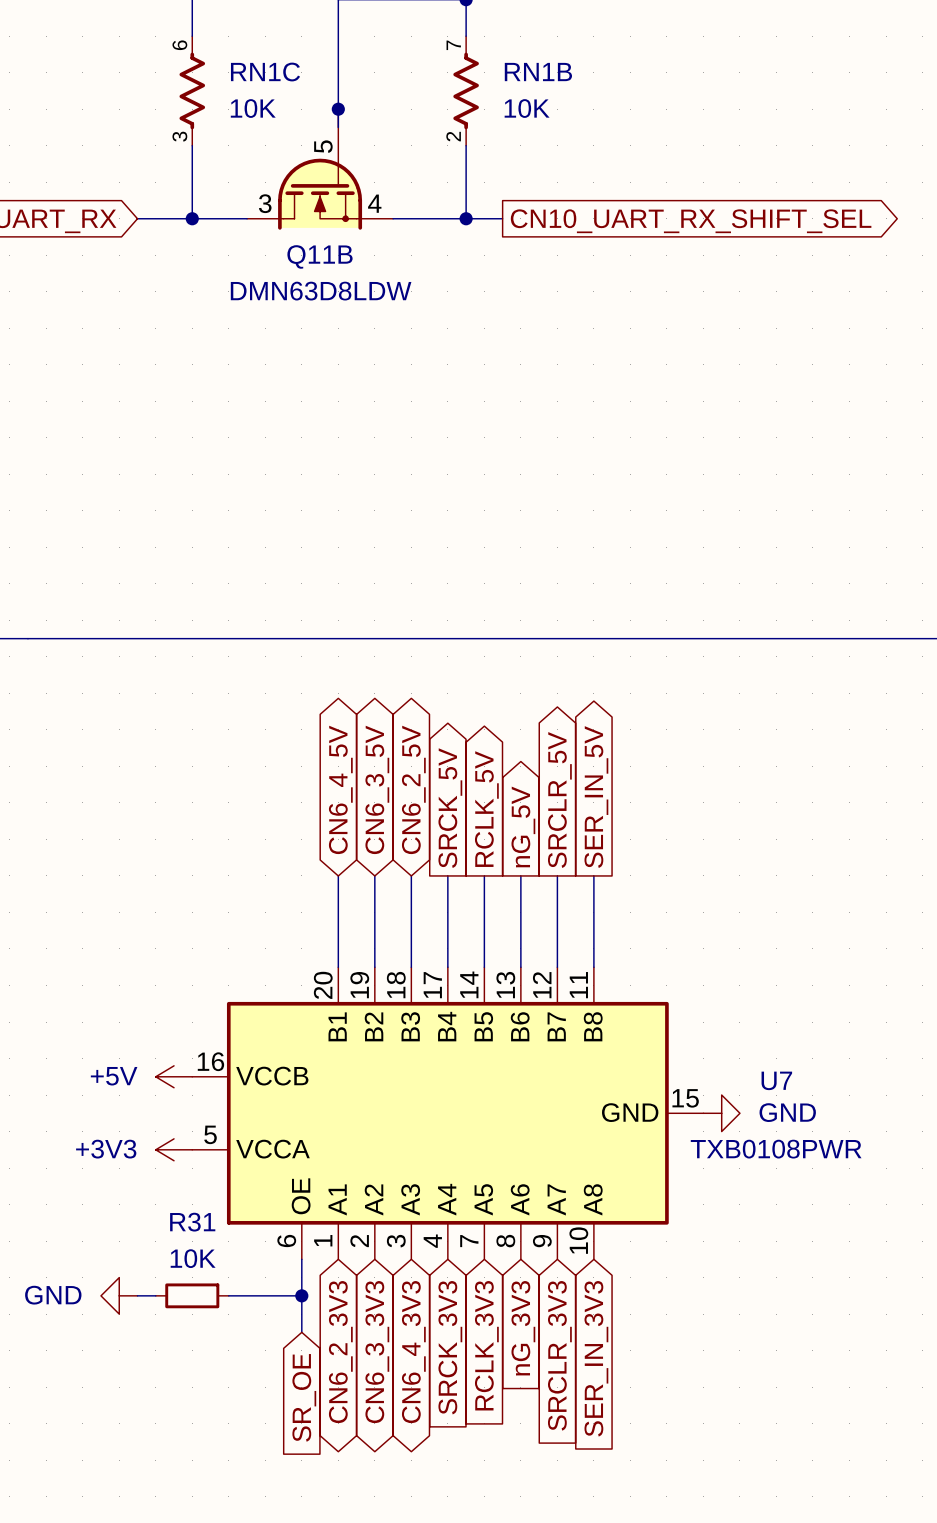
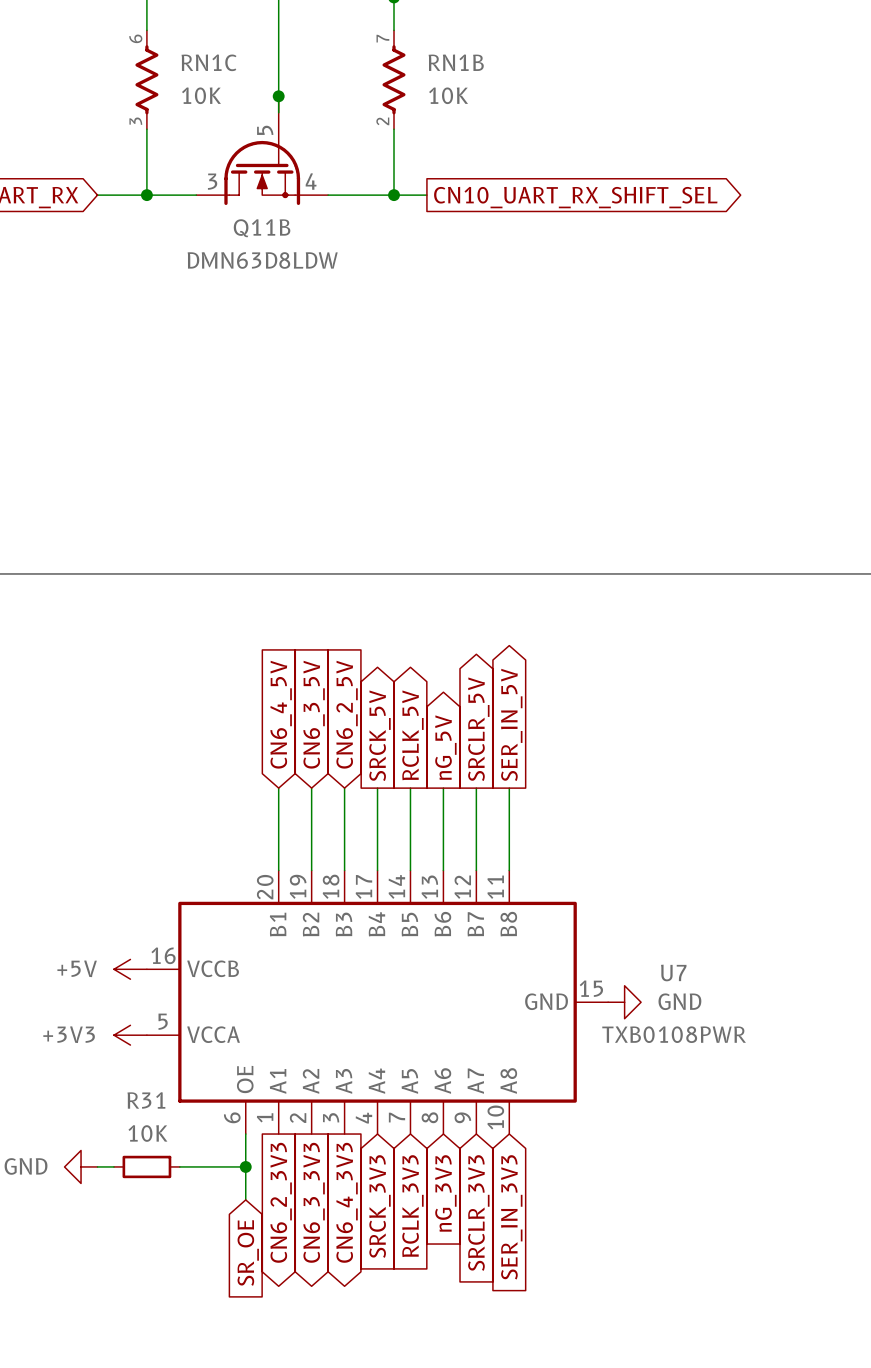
global label shape: bidirectional (340, 789) -> input (281, 714)
global label shape: bidirectional (377, 789) -> input (314, 714)
global label shape: bidirectional (413, 789) -> input (347, 714)
global label shape: bidirectional (340, 1352) -> output (281, 1202)
global label shape: bidirectional (377, 1352) -> output (314, 1202)
global label shape: bidirectional (413, 1352) -> output (347, 1202)

